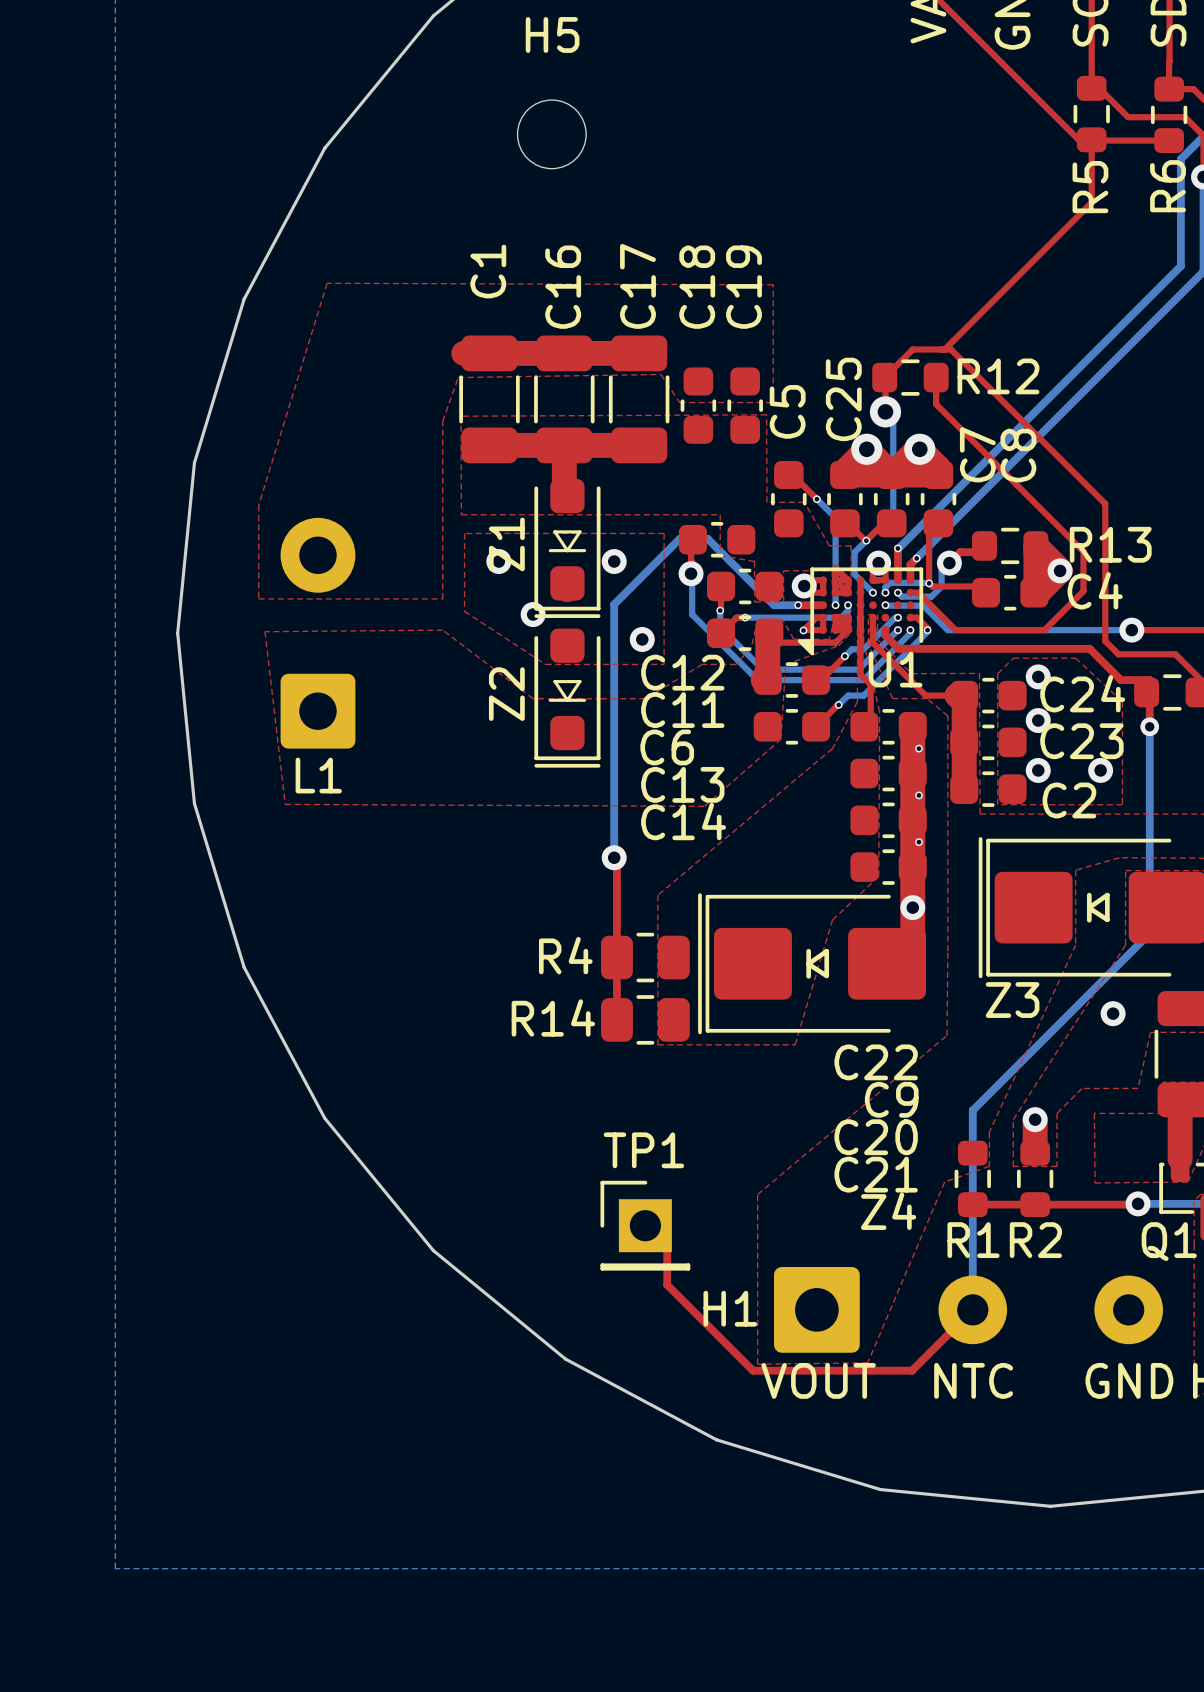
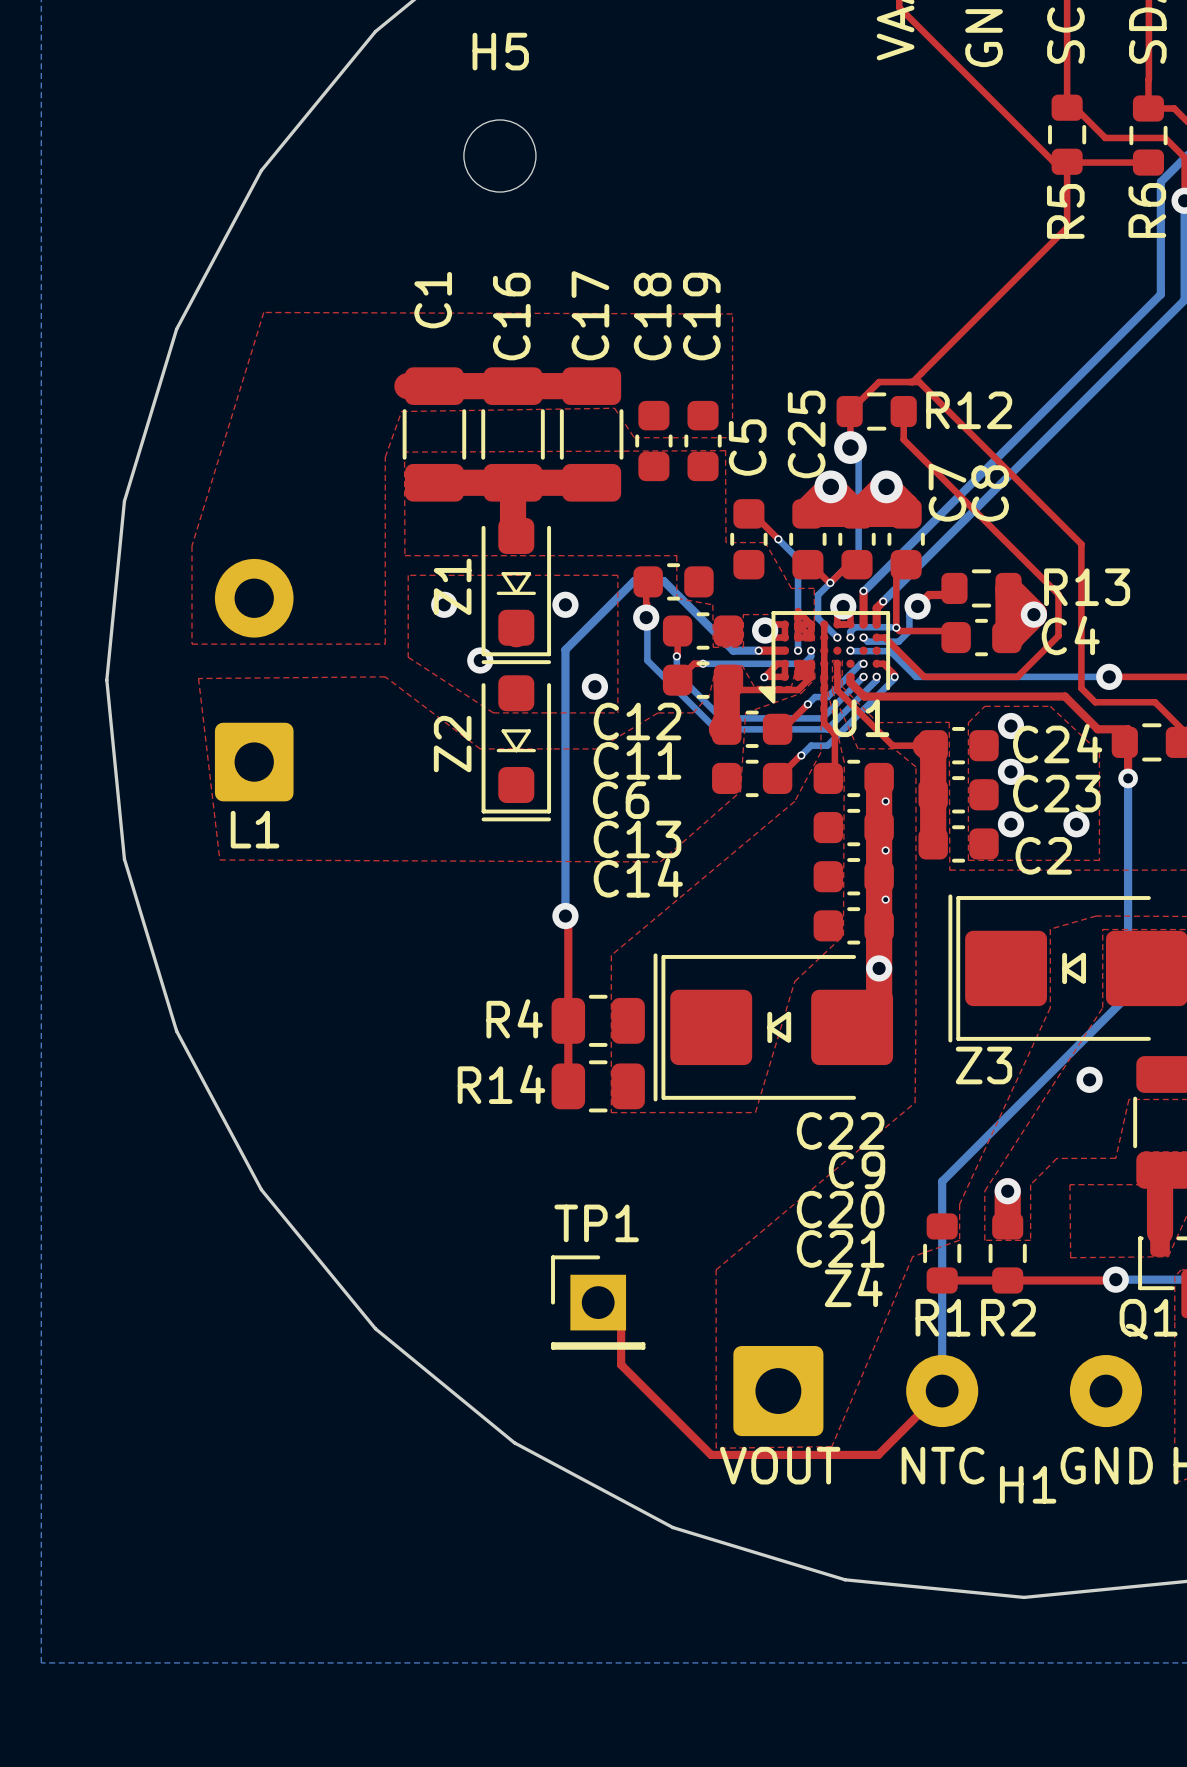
H1 name position: H1 (730, 1308) -> H1 (1028, 1484)

